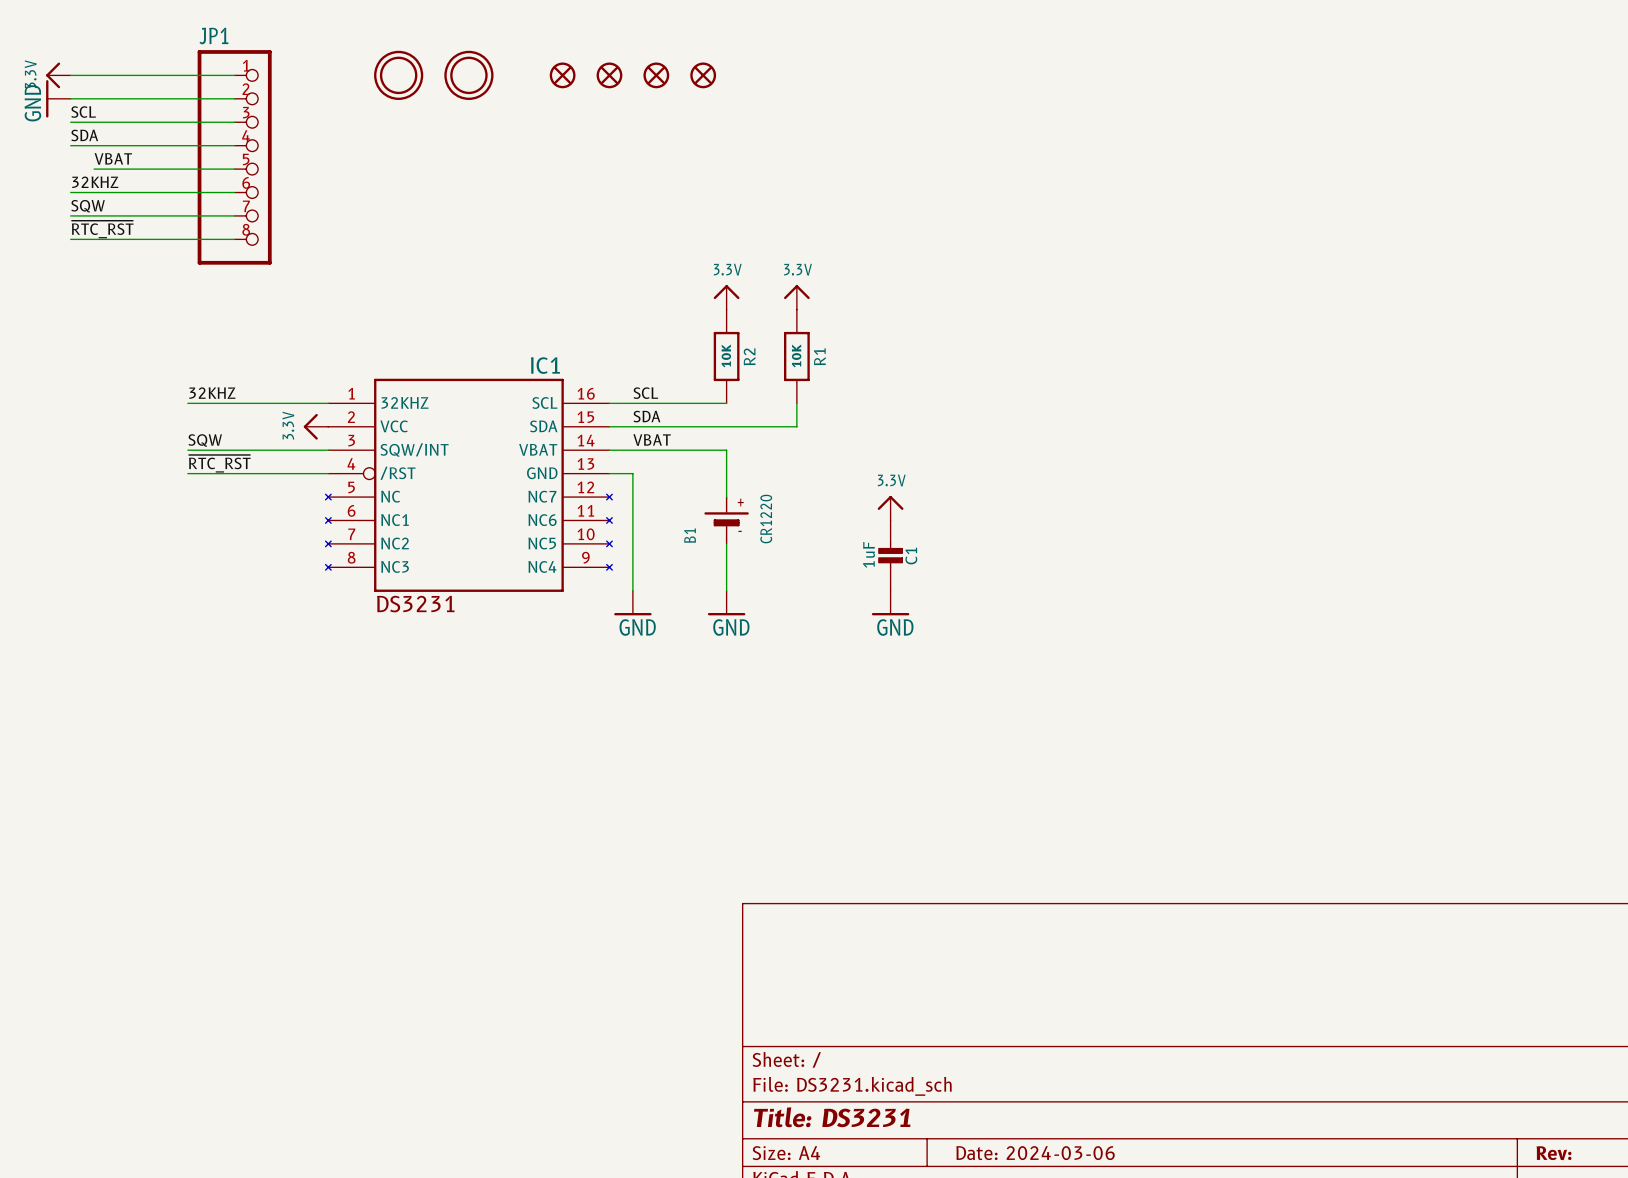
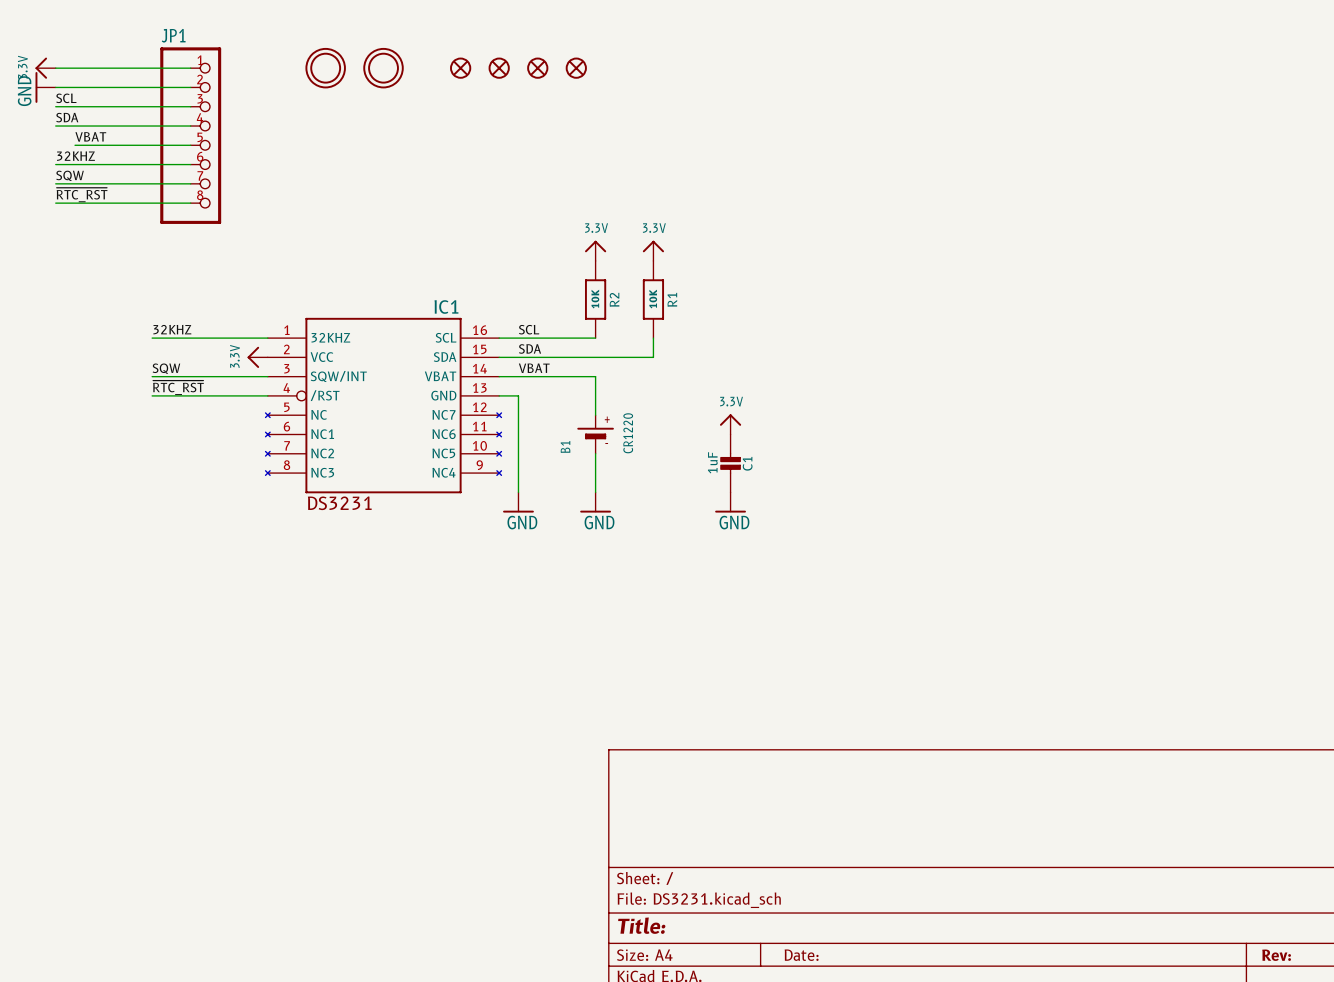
title block: Title: DS3231 (832, 1117) -> Title: (641, 925)
title block: Date: 2024-03-06 (1035, 1153) -> Date: (801, 955)

